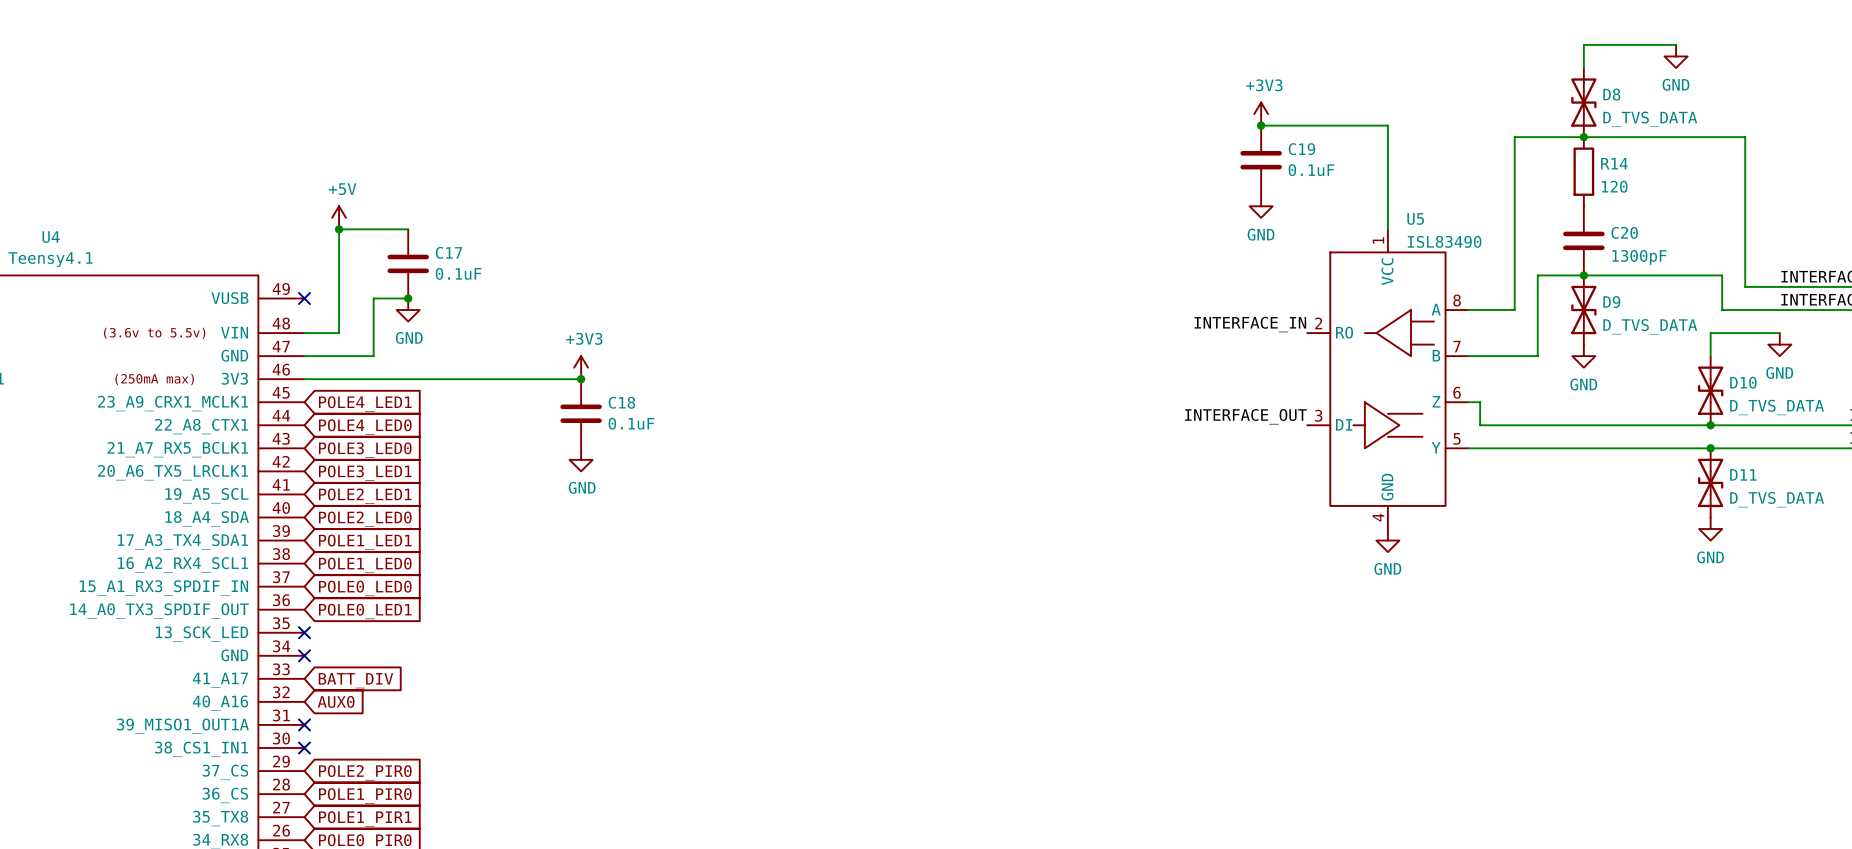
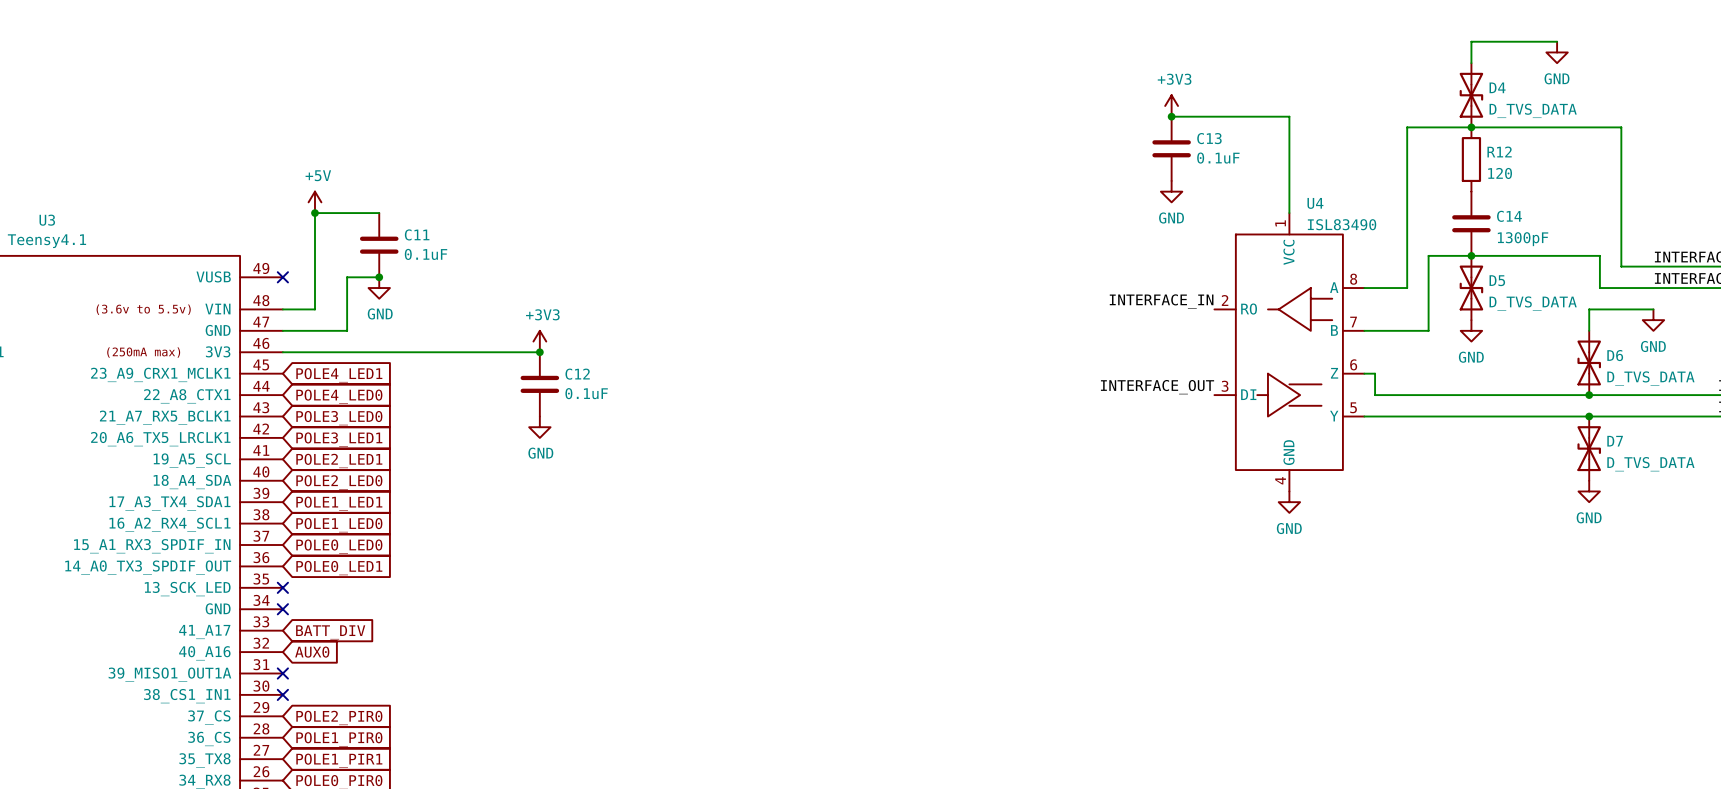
D8 name: D8 (1611, 94) -> D4 (1497, 87)
C19 name: C19 (1301, 149) -> C13 (1209, 138)
R14 name: R14 (1614, 163) -> R12 (1499, 151)
U5 name: U5 (1415, 218) -> U4 (1315, 203)
C20 name: C20 (1624, 232) -> C14 (1509, 216)
U4 name: U4 (51, 237) -> U3 (47, 220)
C17 name: C17 (448, 252) -> C11 (417, 234)
D9 name: D9 (1611, 302) -> D5 (1497, 280)
D10 name: D10 (1743, 382) -> D6 (1615, 355)
C18 name: C18 (621, 402) -> C12 (577, 374)
D11 name: D11 (1743, 474) -> D7 (1615, 441)

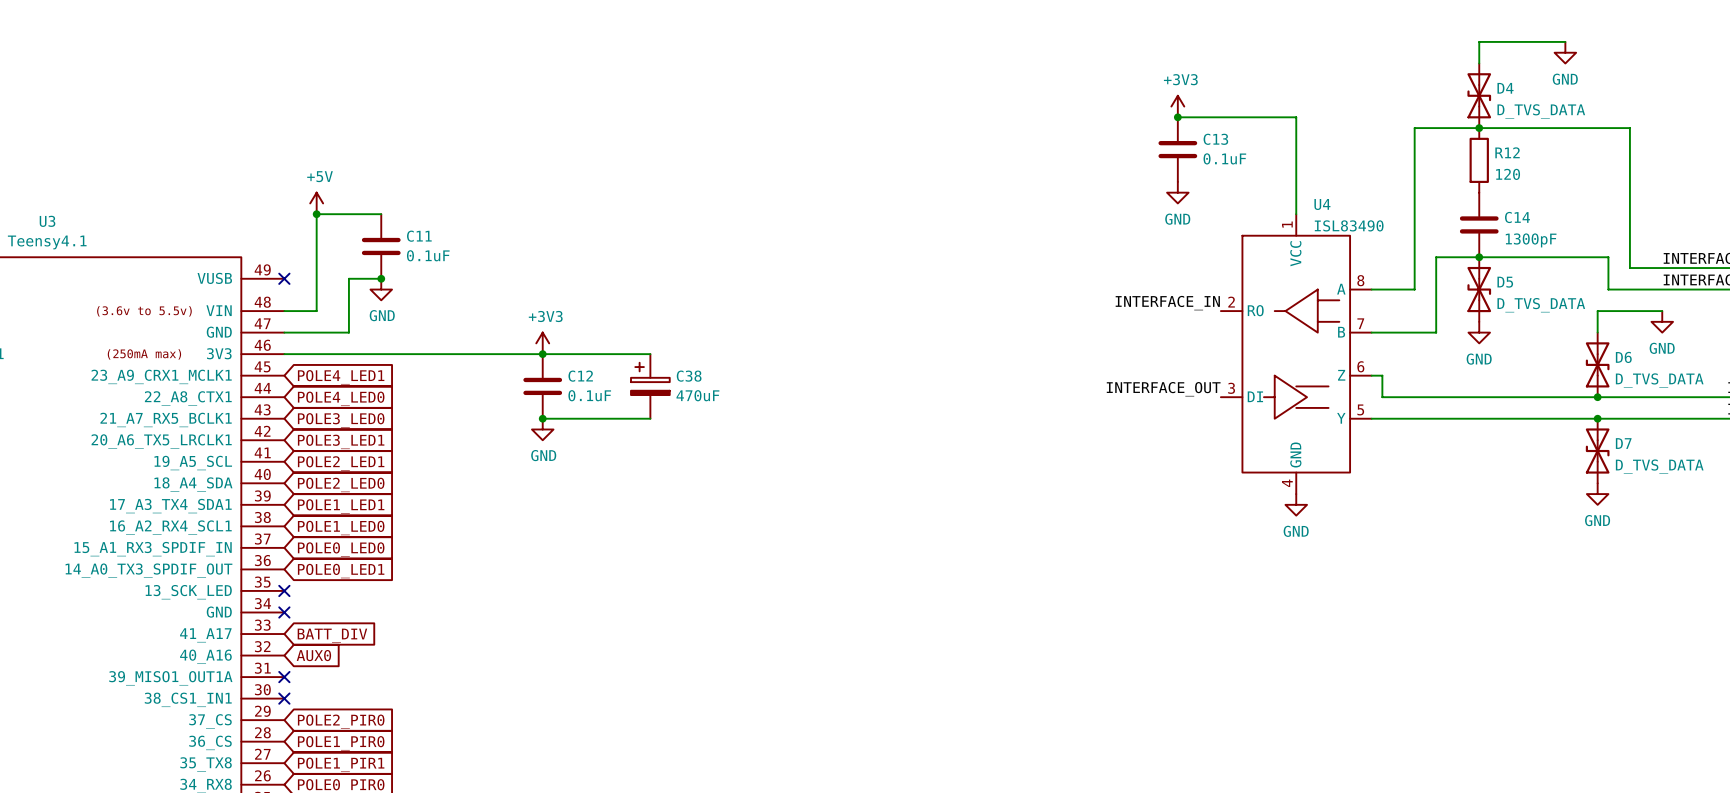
wire: none -> (542, 354) (650, 354)
C38: none -> 470uF (650, 386)
wire: none -> (542, 418) (650, 418)
junction: none -> (542, 418)

